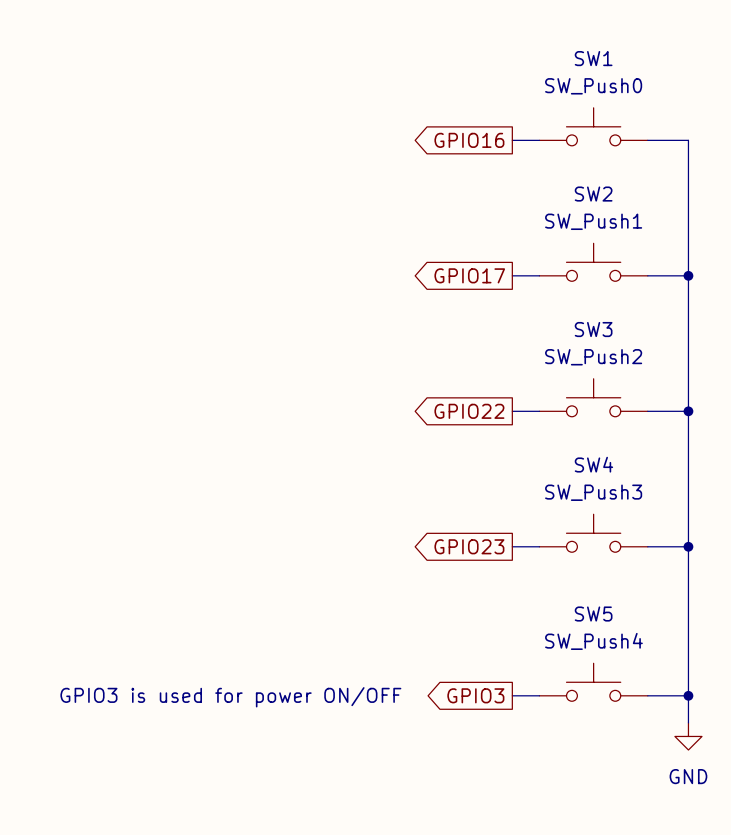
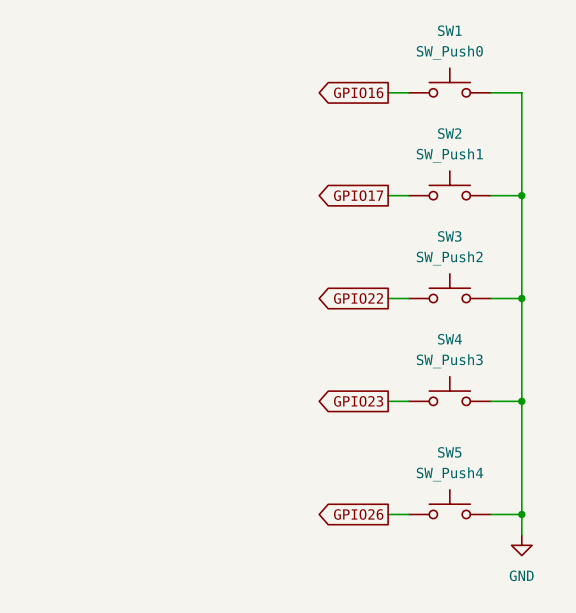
global label: GPIO3 (475, 695) -> GPIO26 (358, 514)
text: GPIO3 is used for power ON/OFF (230, 697) -> none

